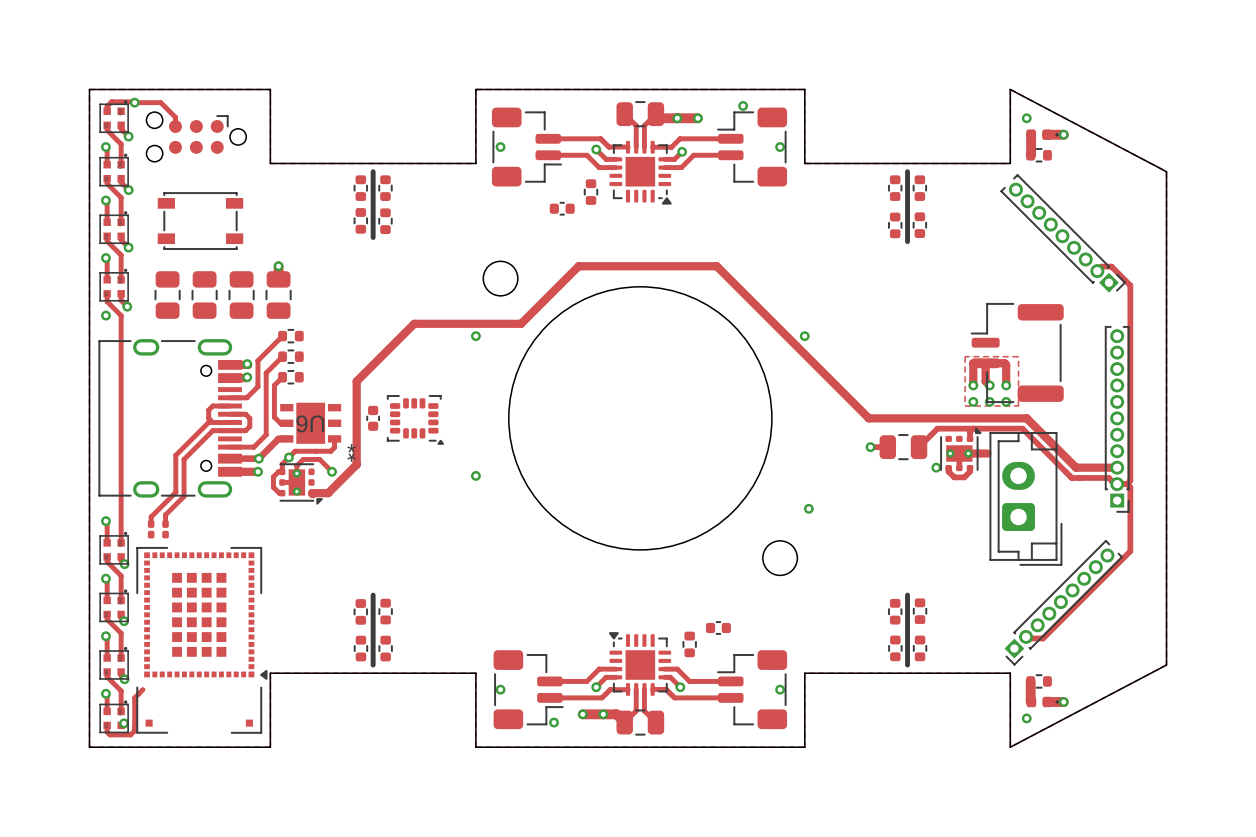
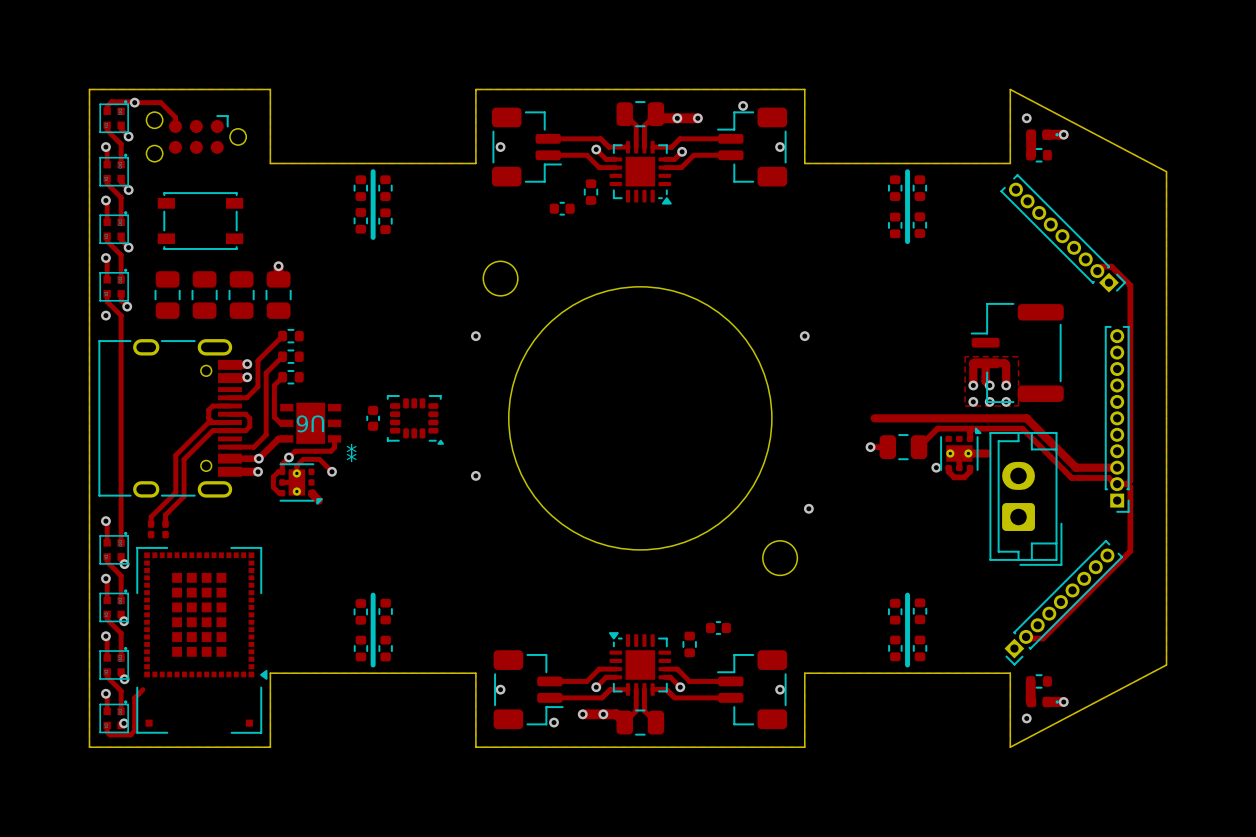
track: (874, 418) (868, 418) (716, 266) (578, 266) (521, 323) (414, 323) (356, 381) (356, 464) (328, 493) (312, 493) -> none
track: none -> (312, 494) (318, 500)

